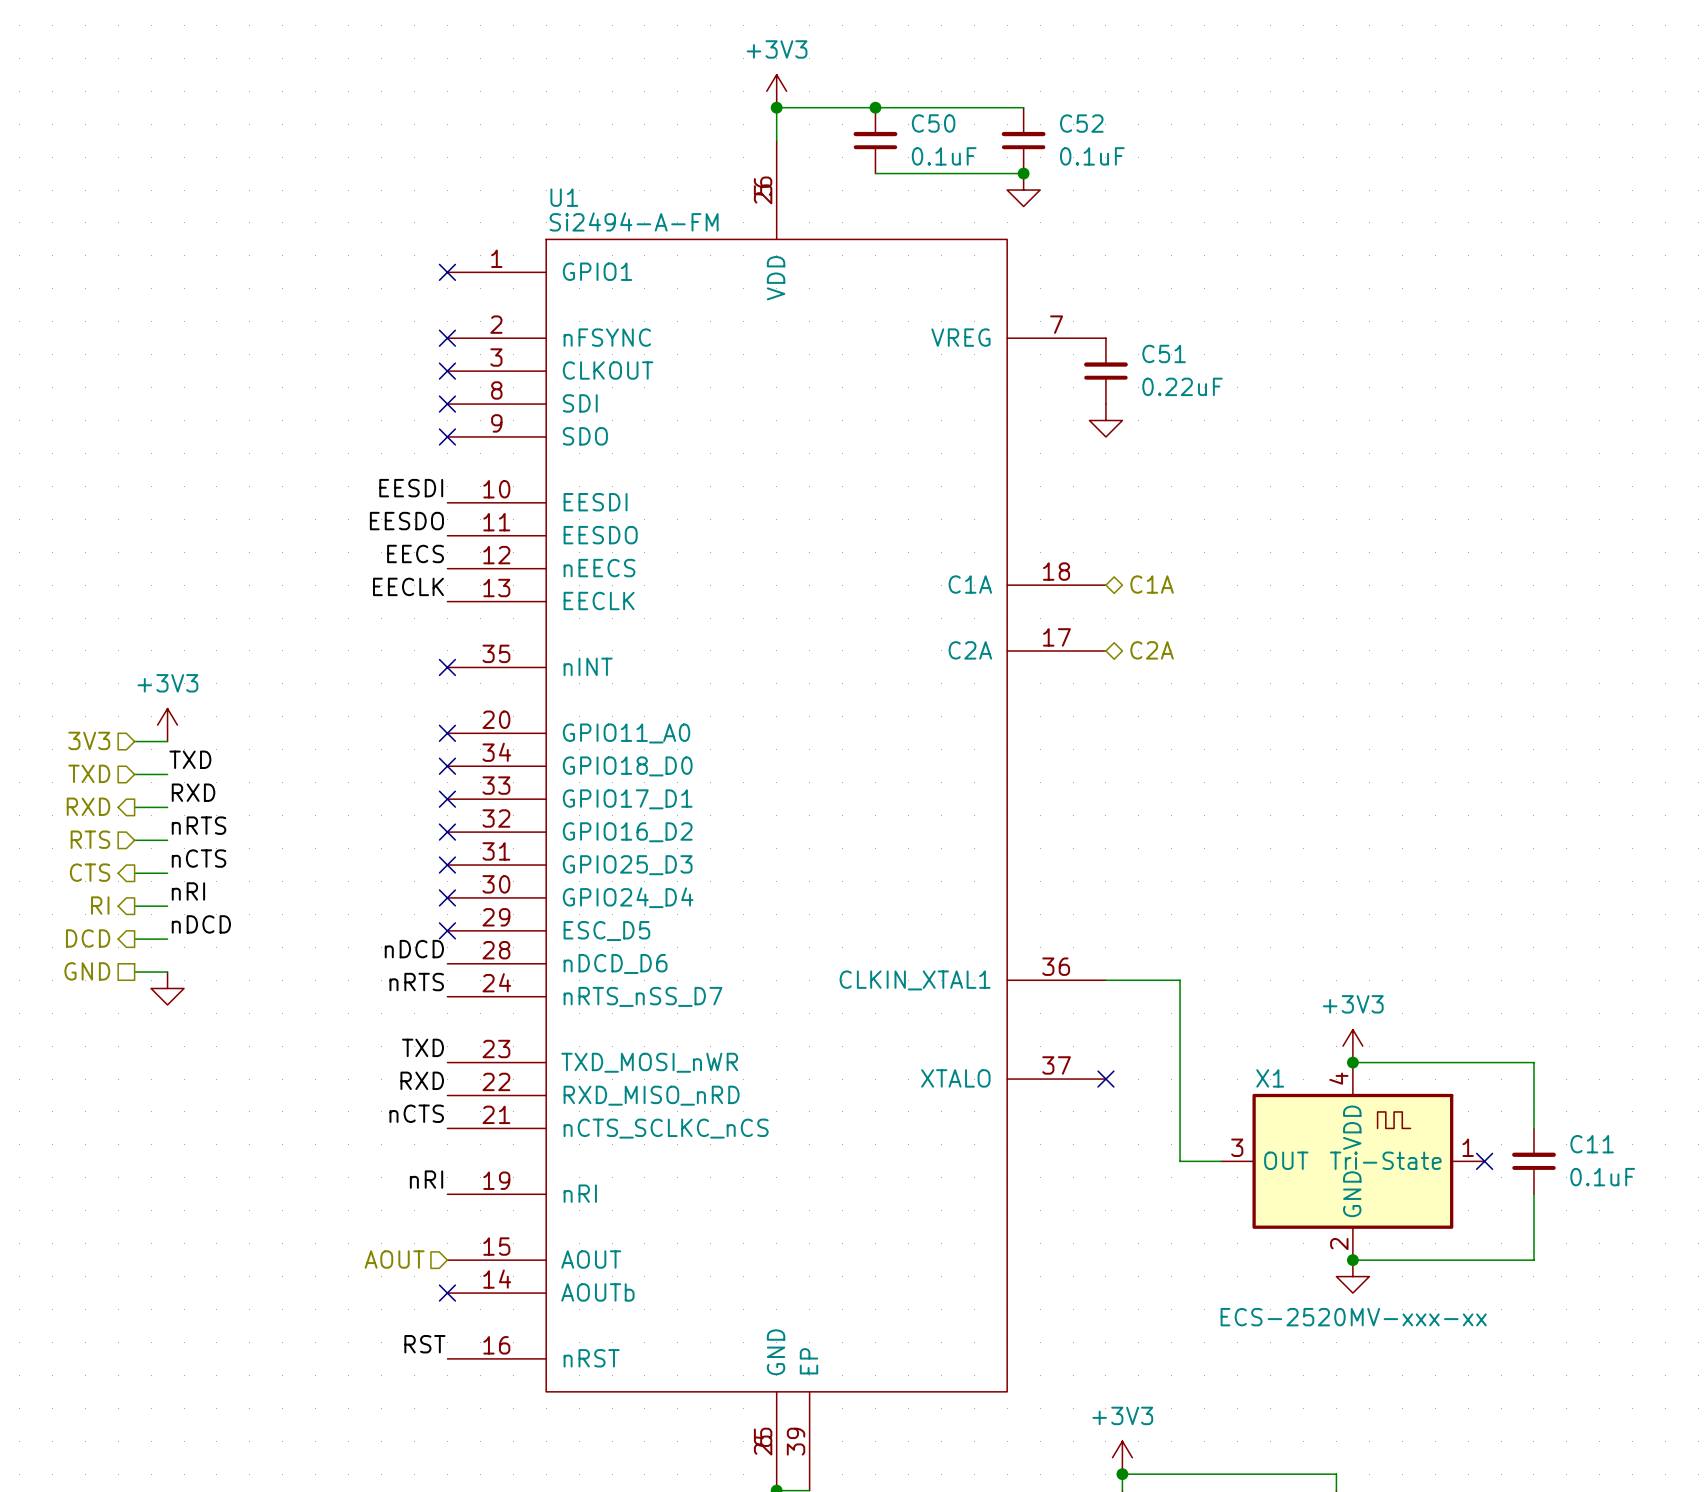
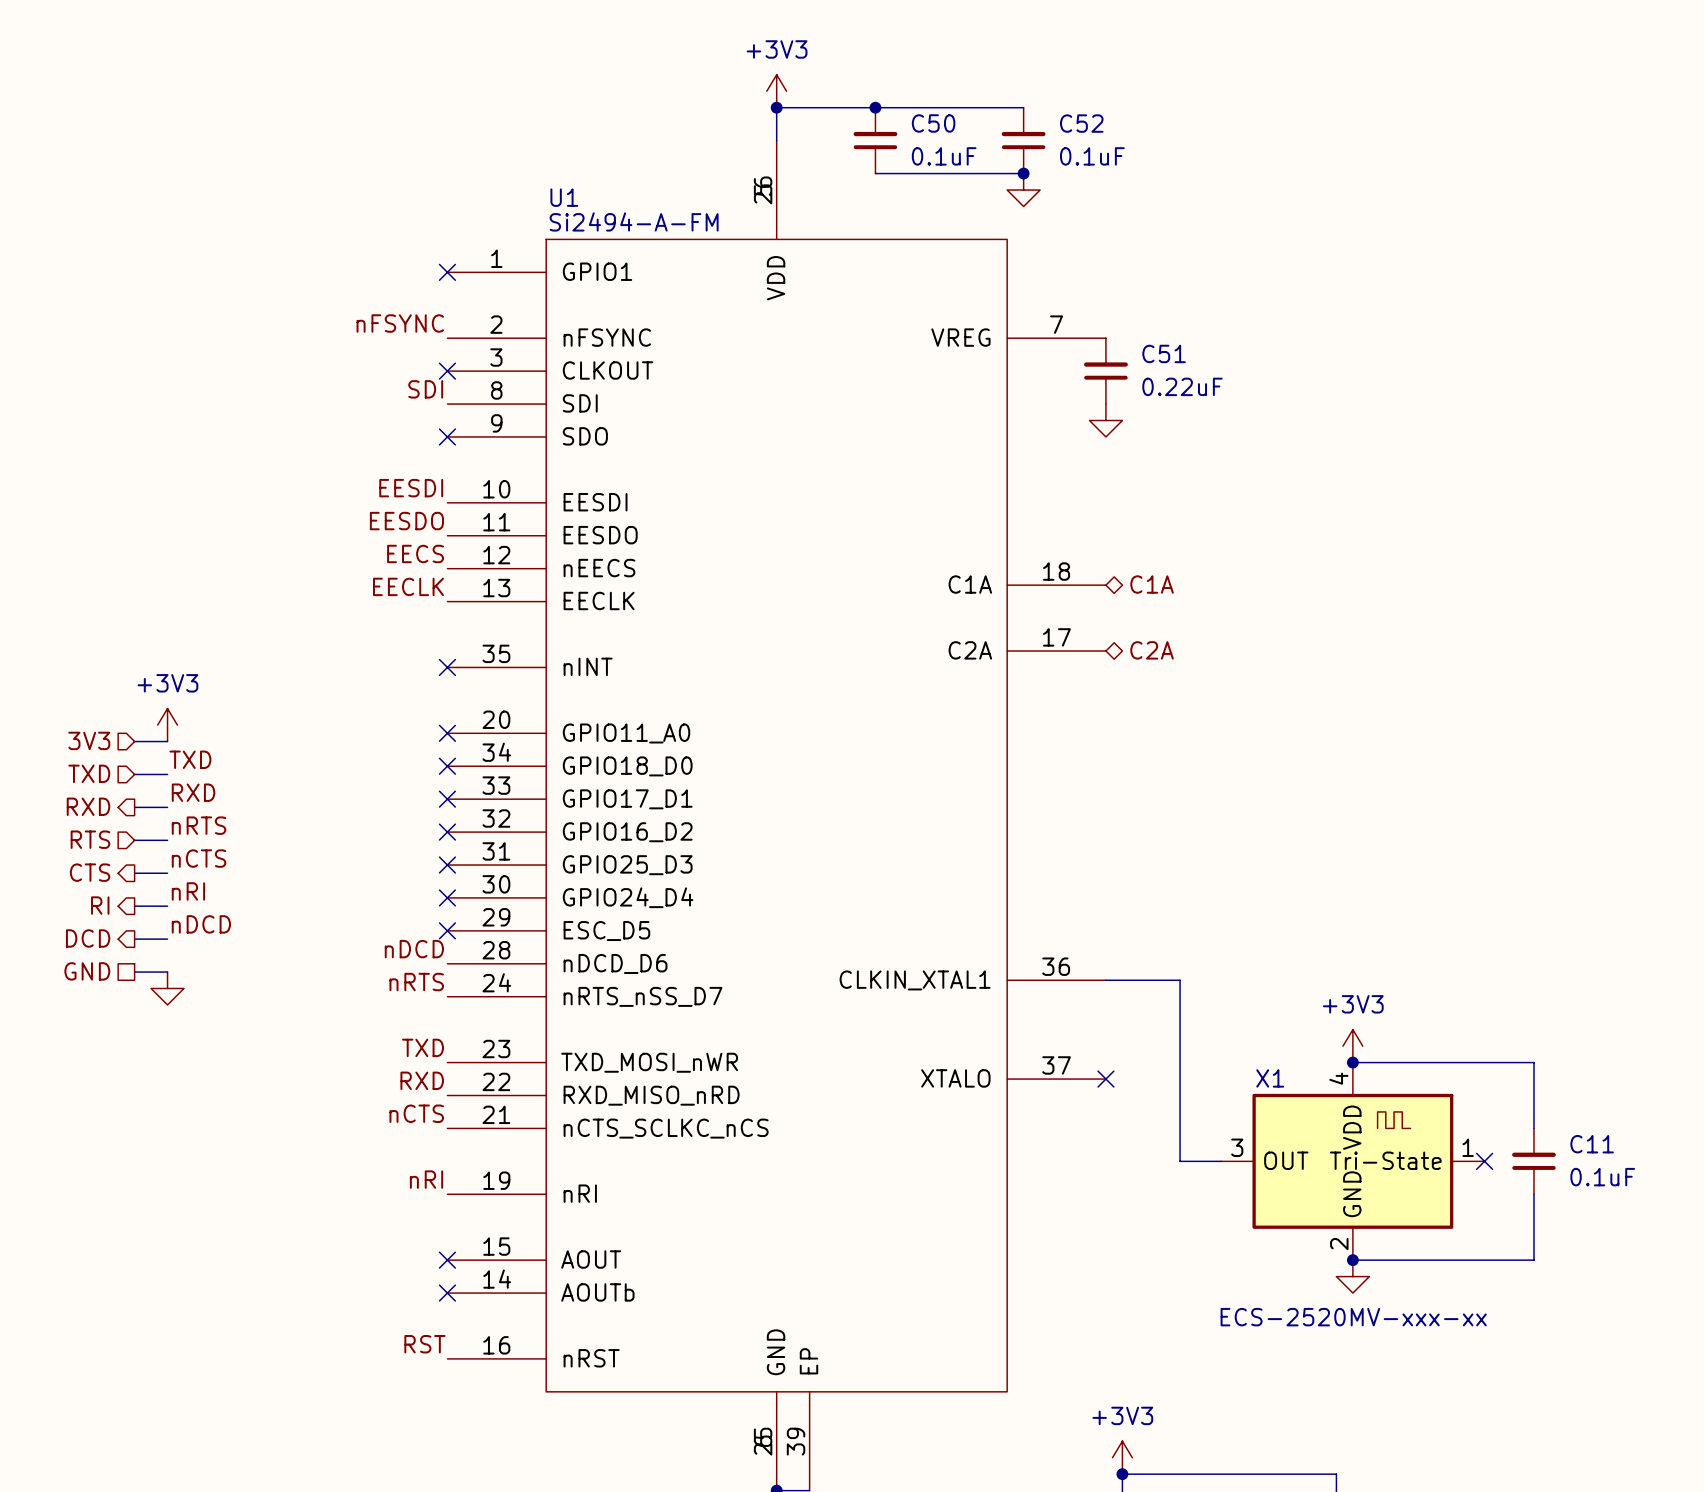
label: none -> nFSYNC (400, 323)
no-connect mark: (447, 338) -> none
label: none -> SDI (425, 389)
no-connect mark: (447, 404) -> none
hierarchical label: AOUT (394, 1259) -> none
no-connect mark: none -> (447, 1260)

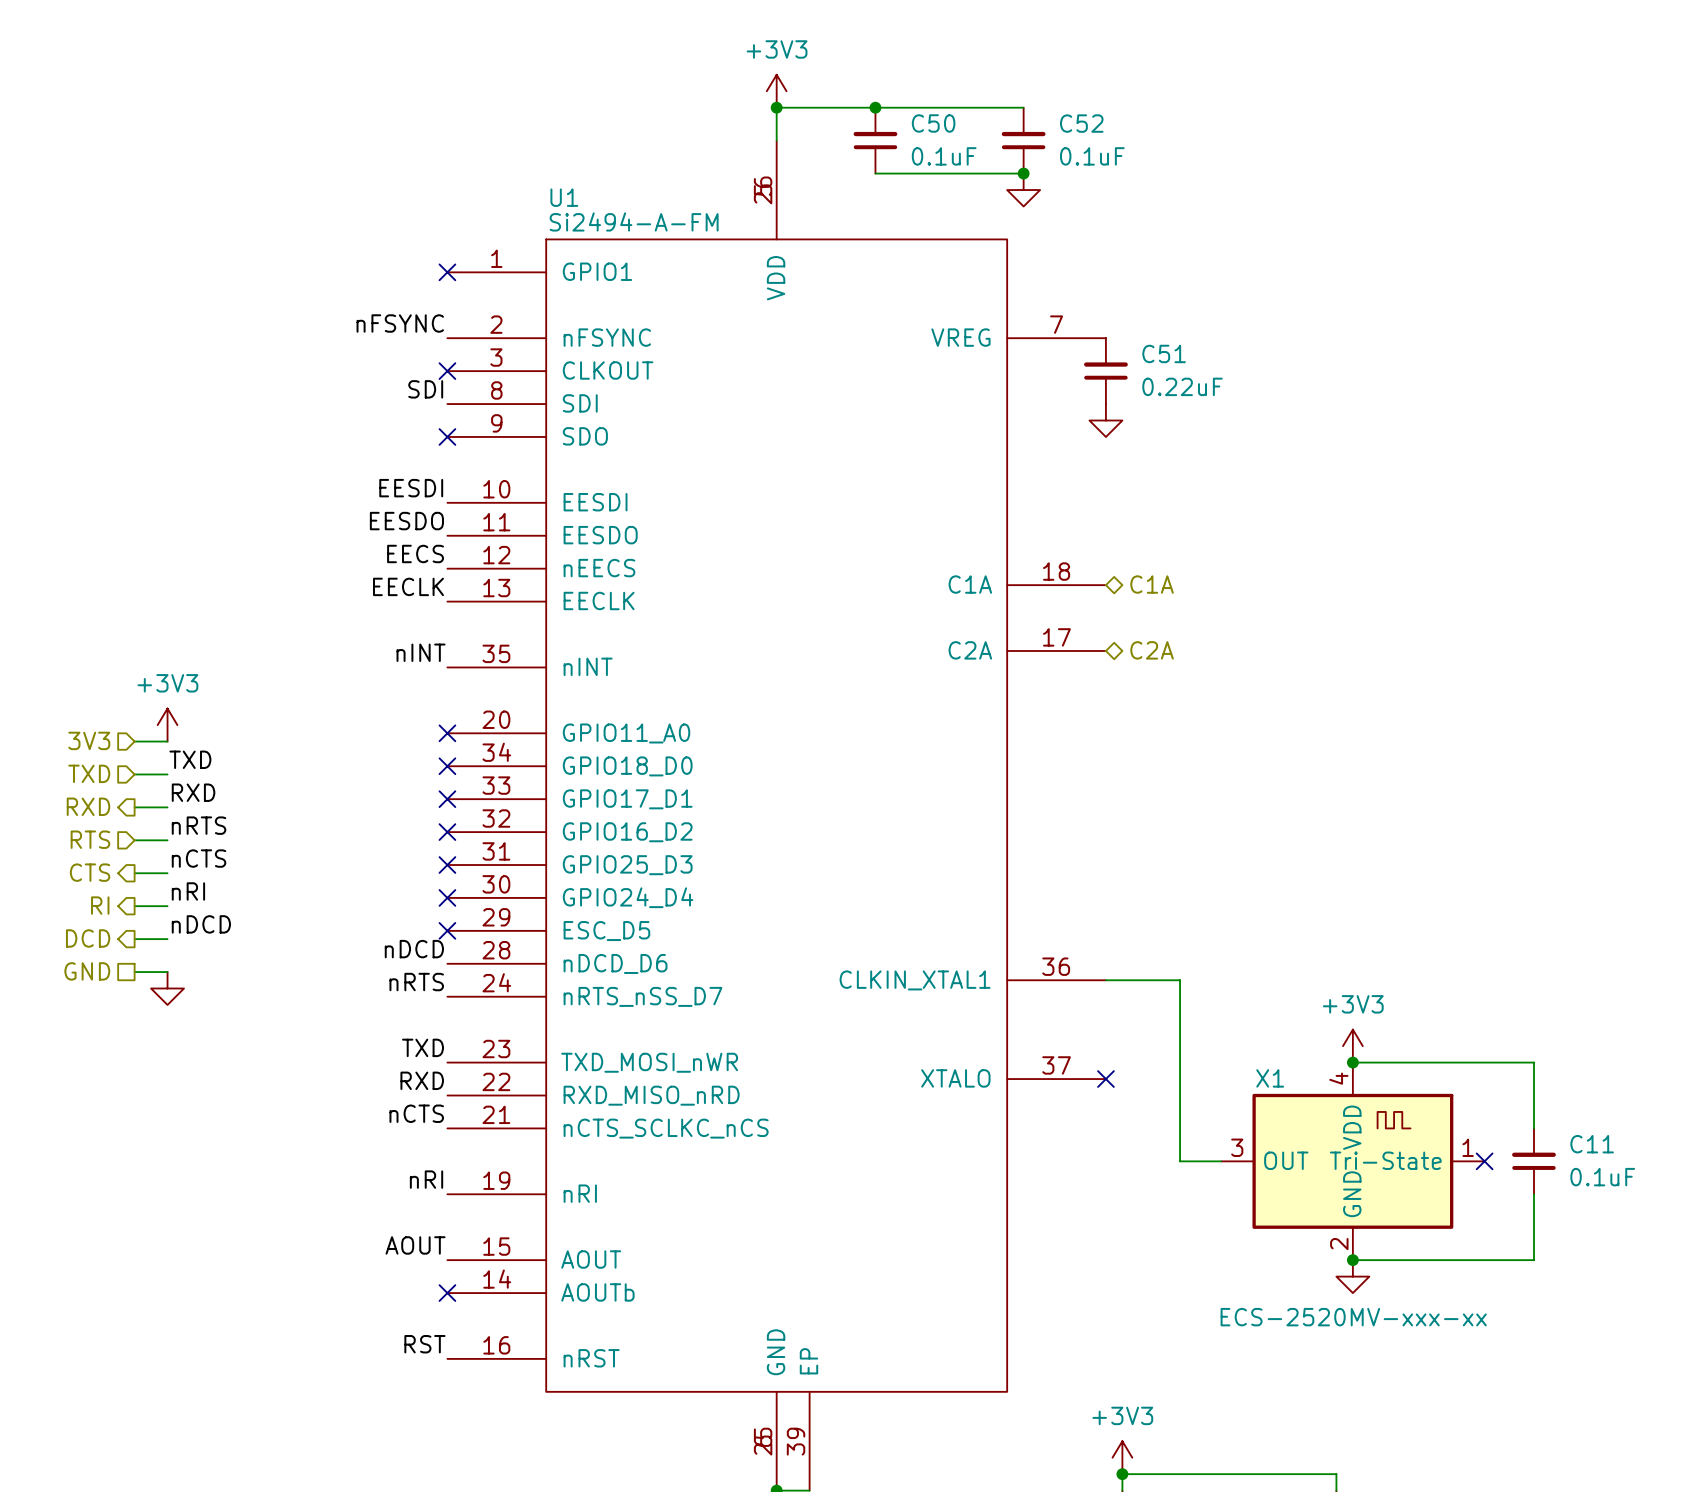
label: none -> nINT (421, 652)
no-connect mark: (447, 667) -> none
label: none -> AOUT (415, 1245)
no-connect mark: (447, 1260) -> none

